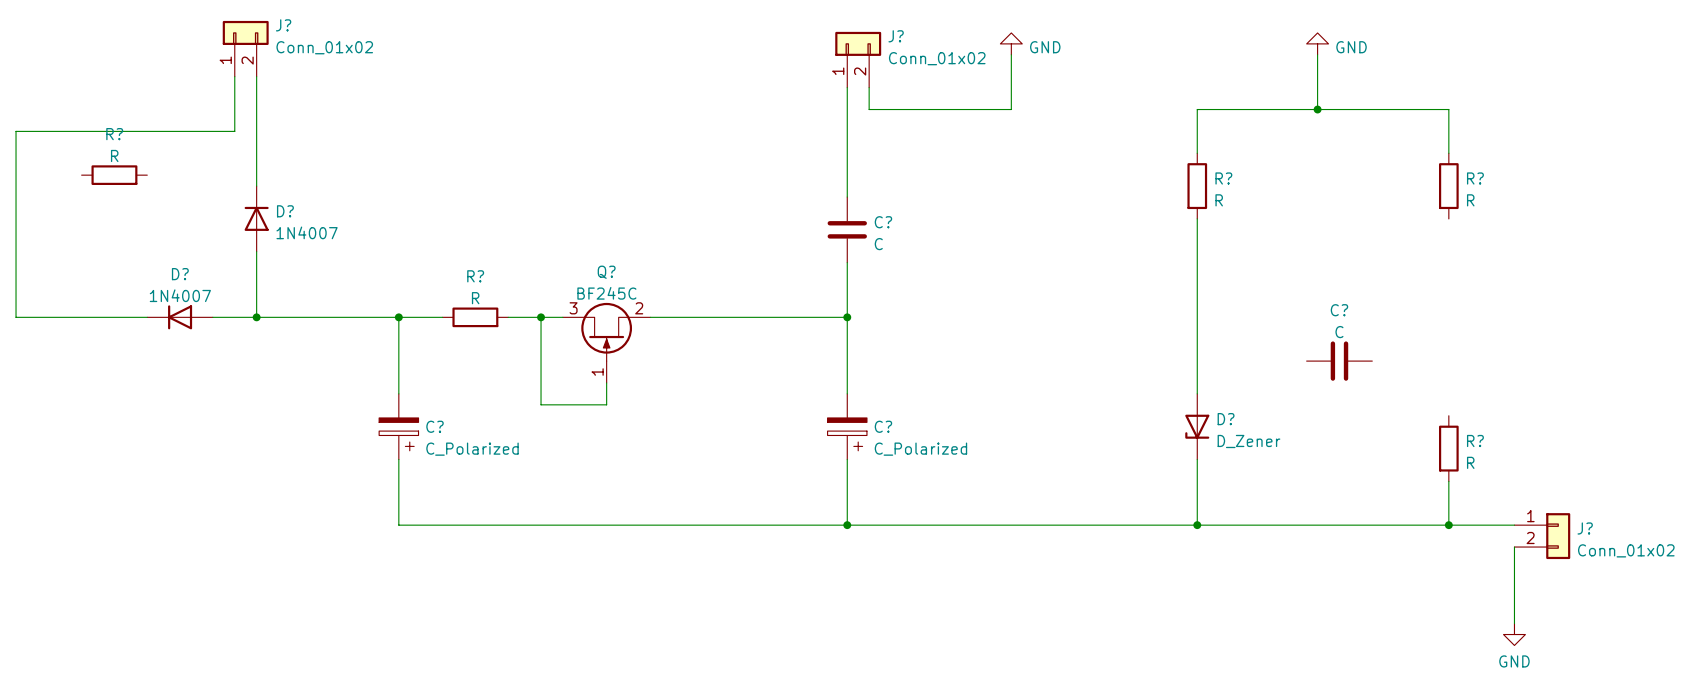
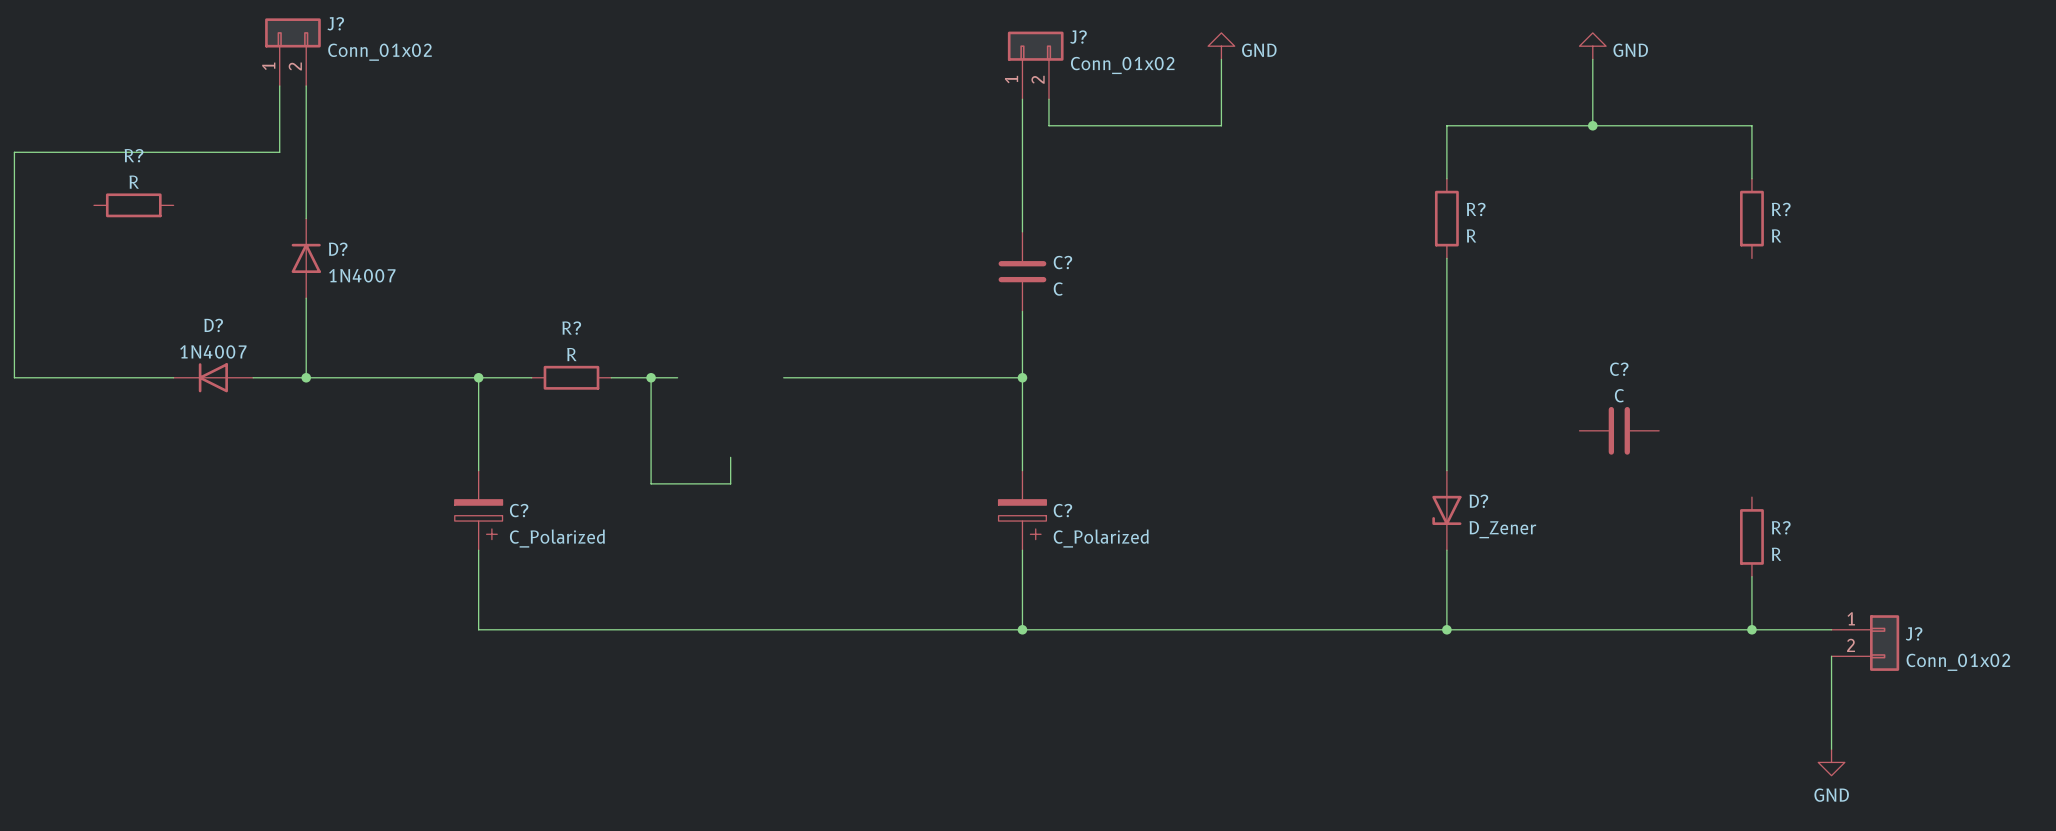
Q?: BF245C (606, 342) -> none

